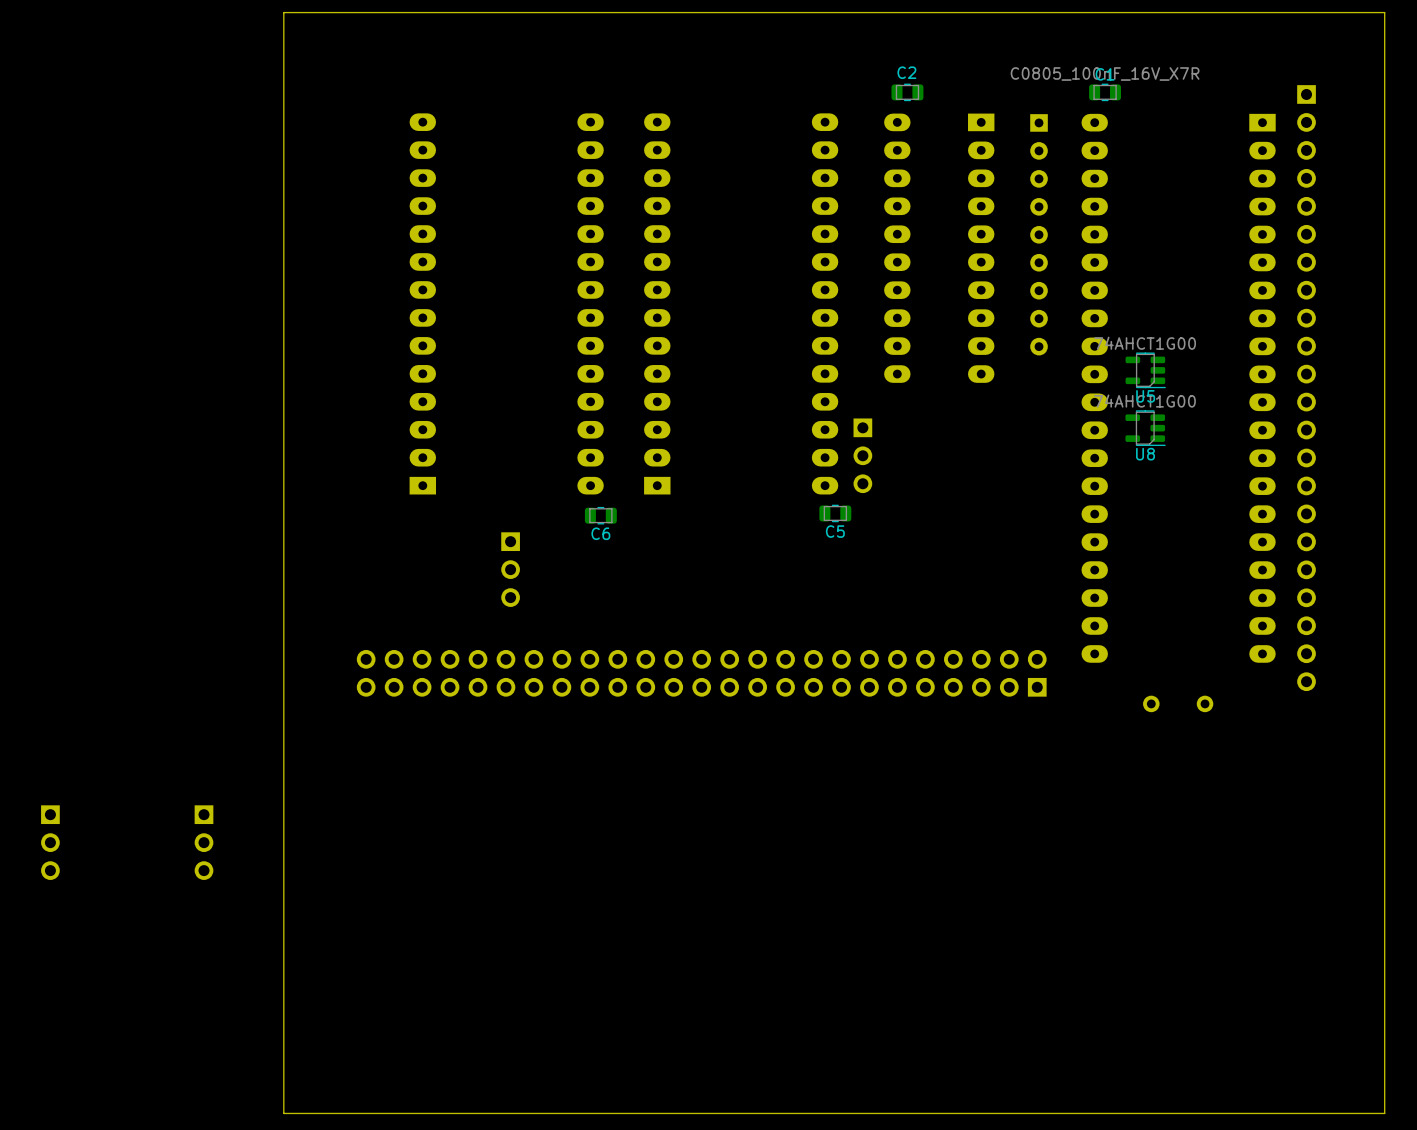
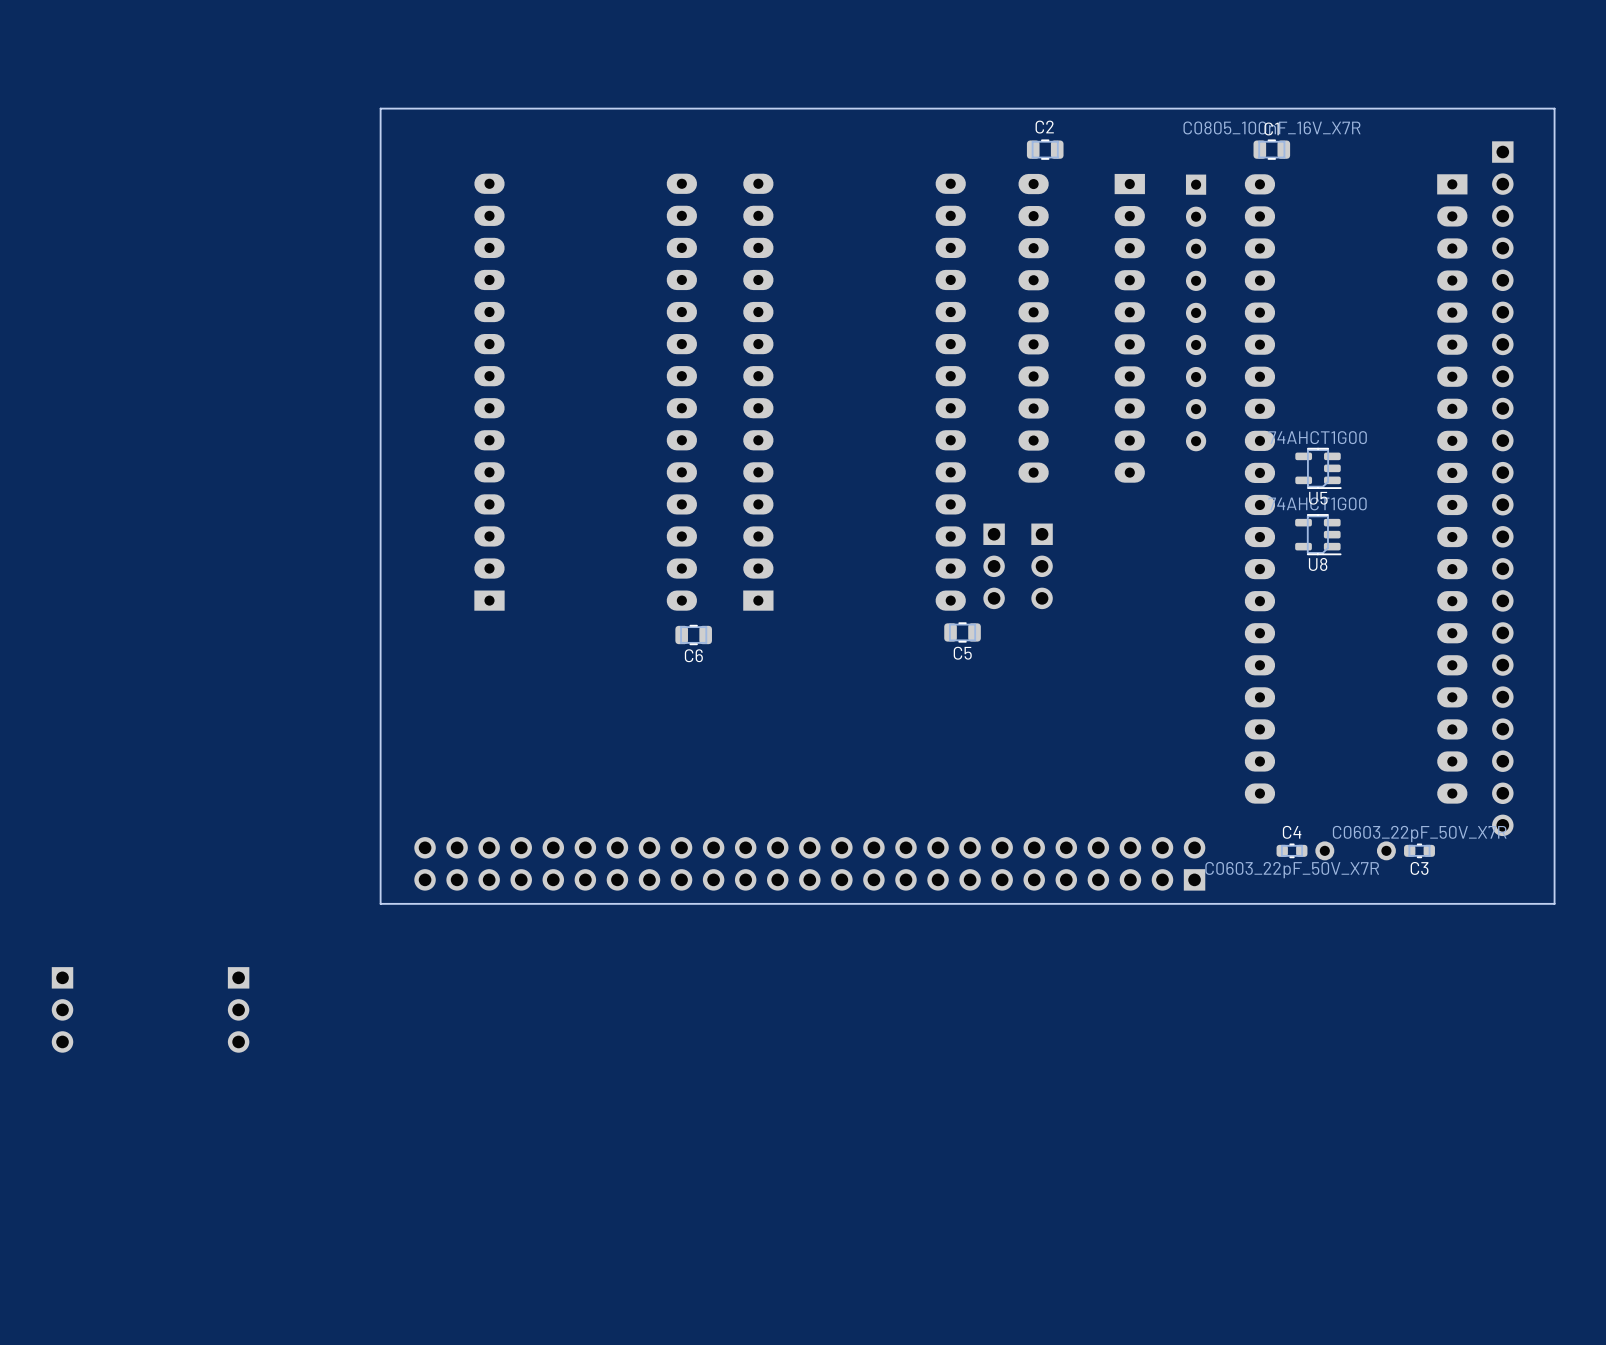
board edge: (1384, 12) (1384, 1113) (283, 1113) (283, 12) (1384, 12) -> (1554, 108) (1554, 903) (380, 903) (380, 108) (1554, 108)
part: none -> (1042, 566)
part: (510, 569) -> none
part position: (701, 673) -> (809, 863)
C4: none -> C0603_22pF_50V_X7R (1292, 850)
C3: none -> C0603_22pF_50V_X7R (1419, 850)

